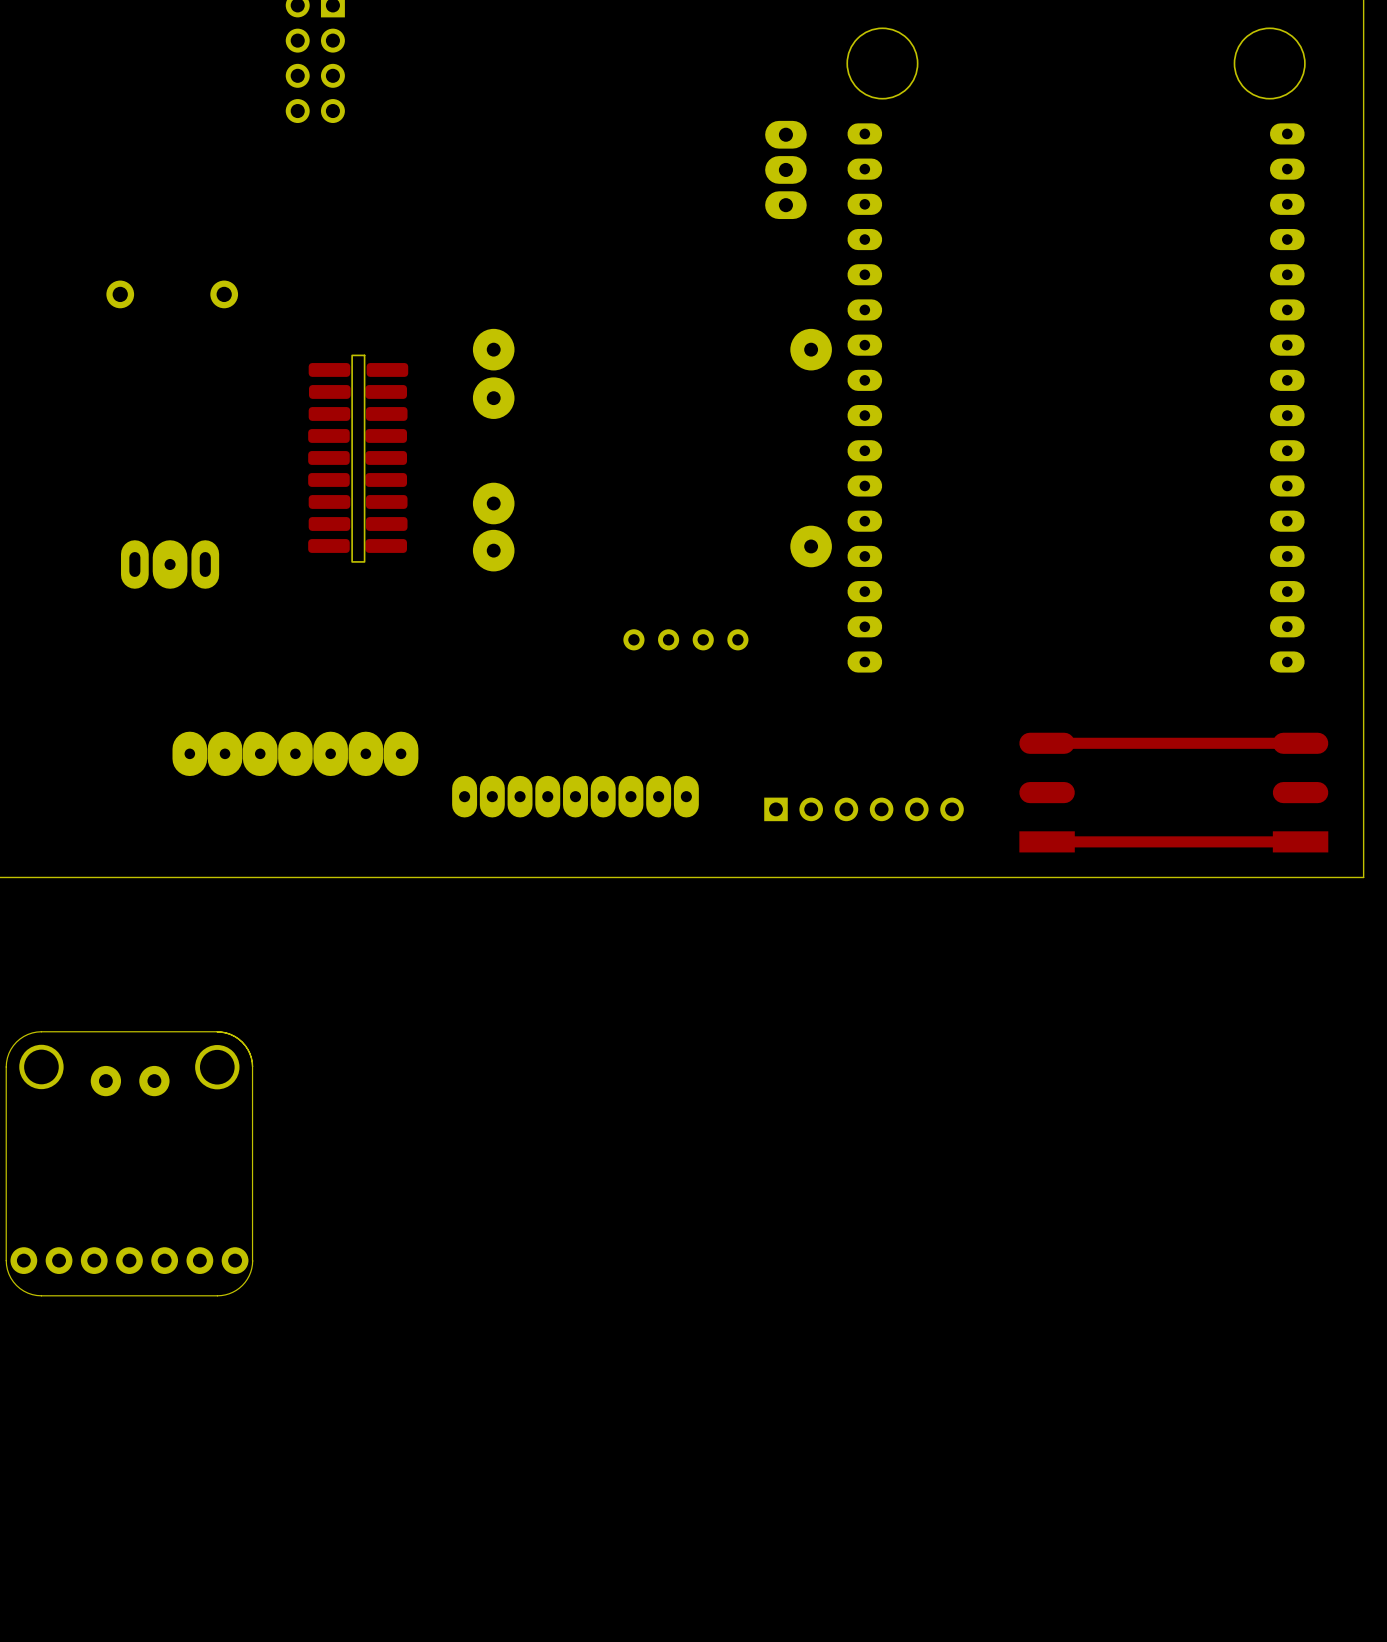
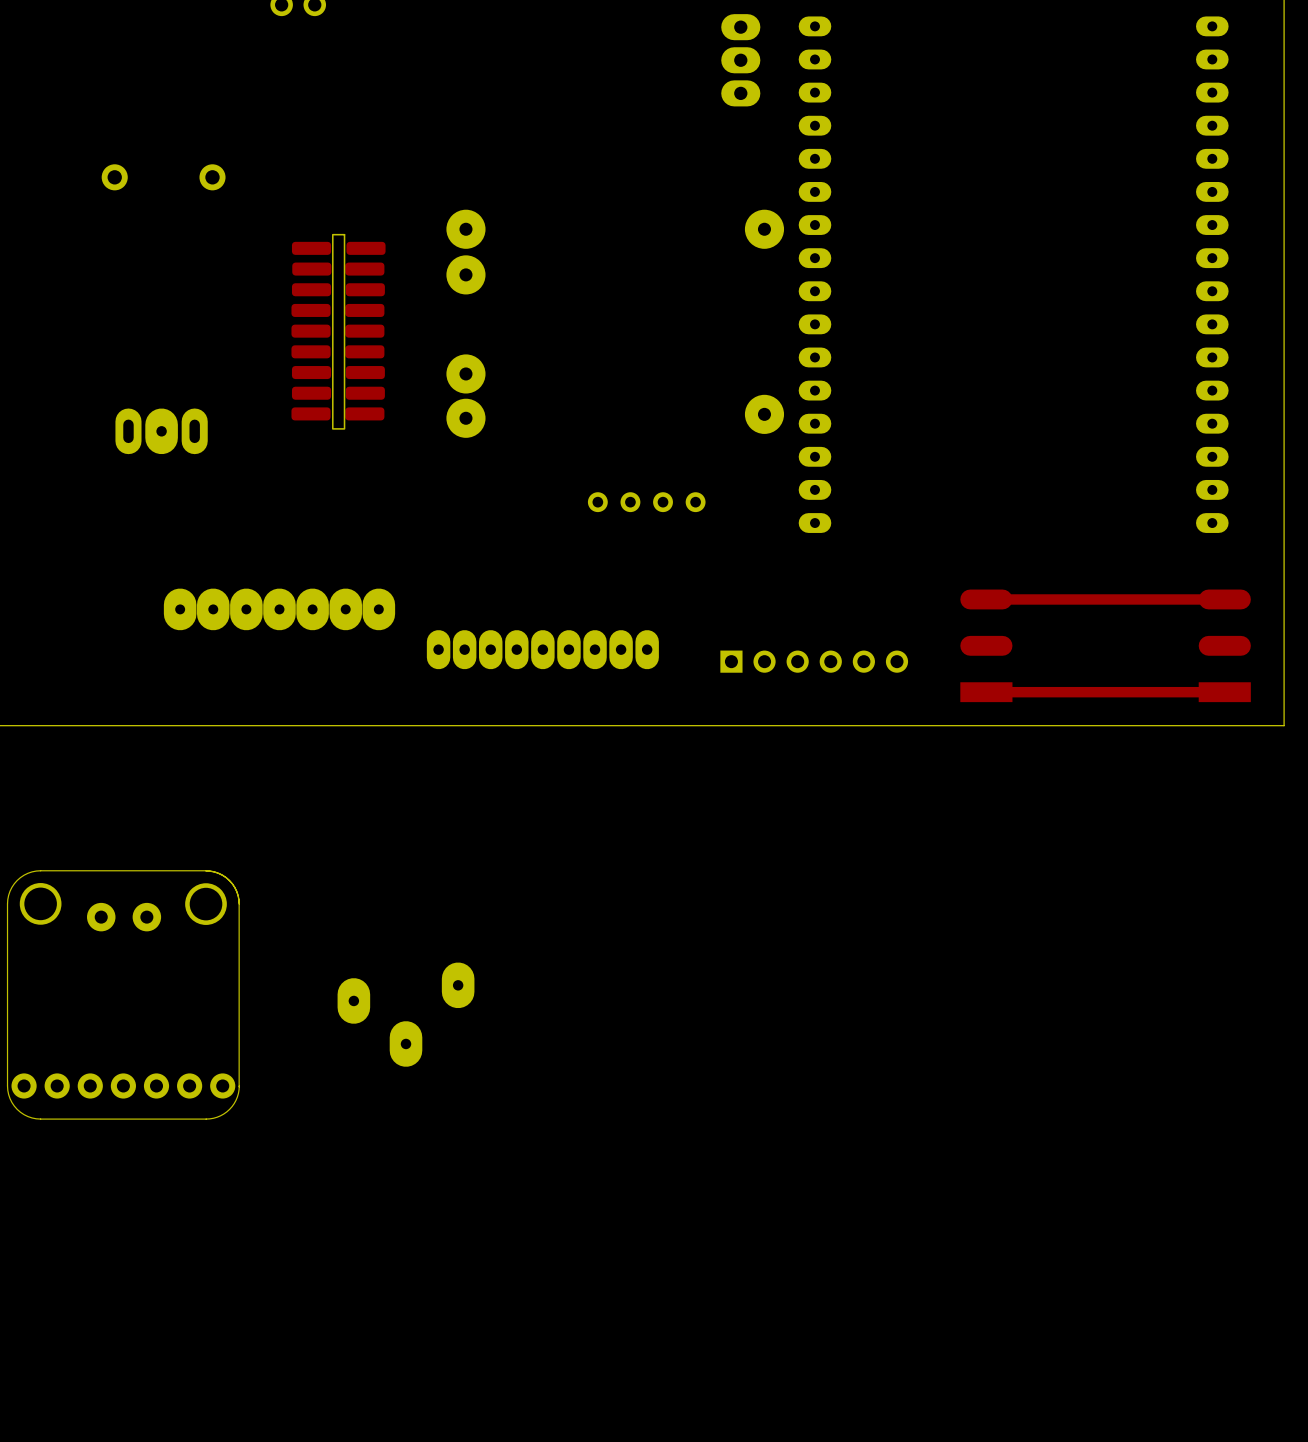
part: none -> (405, 1014)

